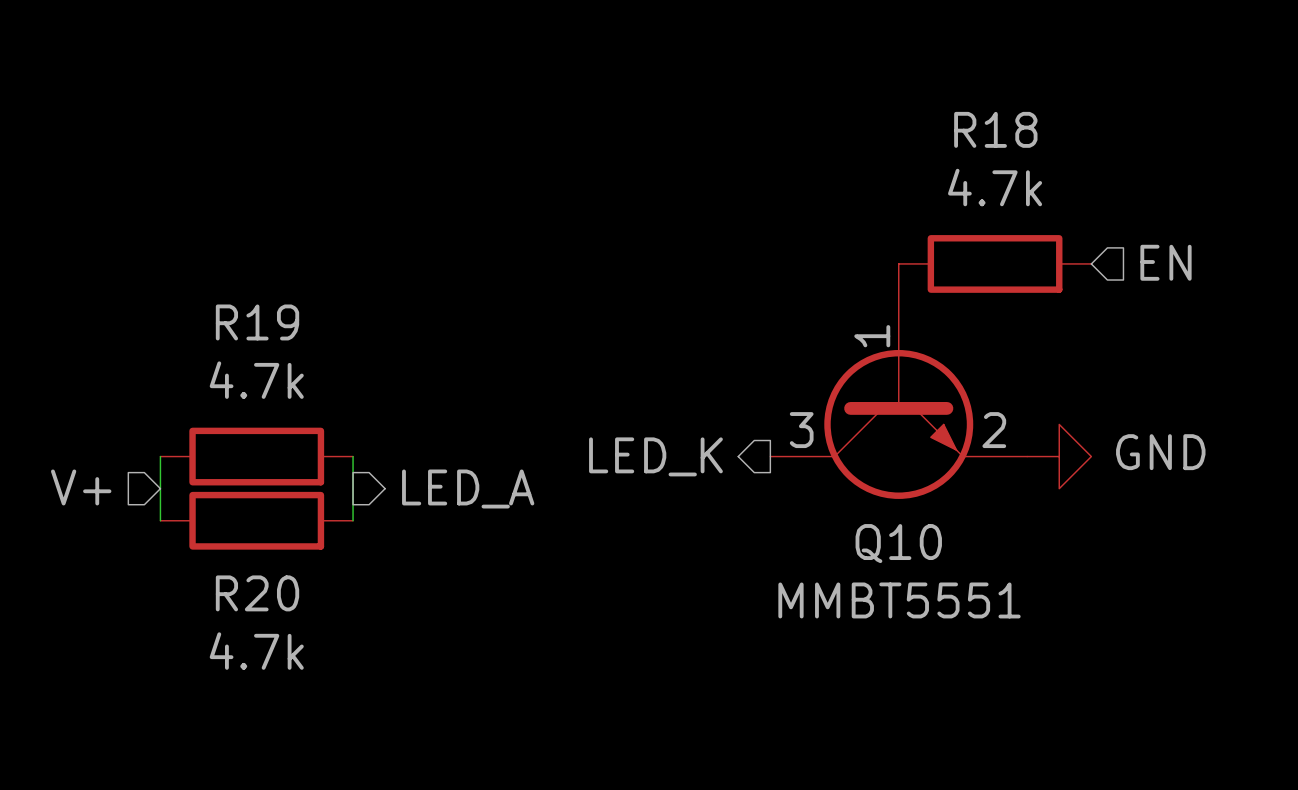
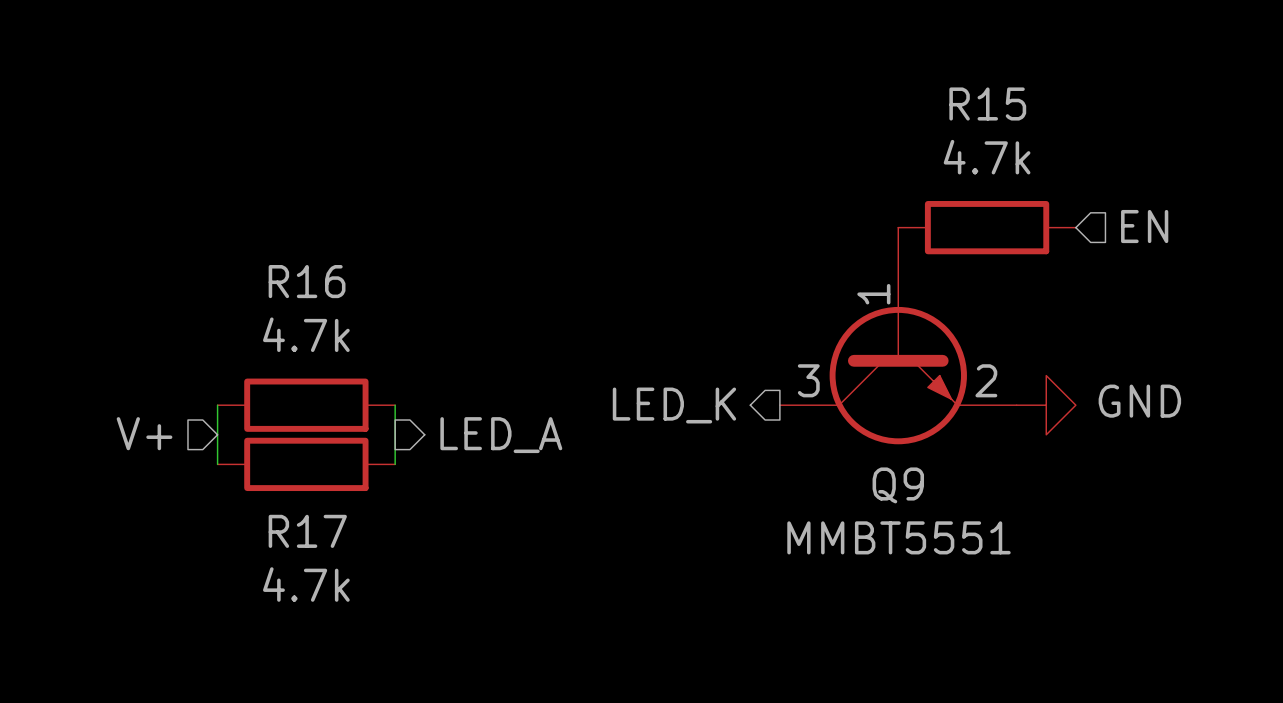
R18 name: R18 (995, 129) -> R15 (987, 103)
R19 name: R19 (257, 322) -> R16 (307, 281)
Q10 name: Q10 (898, 543) -> Q9 (898, 485)
R20 name: R20 (257, 593) -> R17 (307, 531)

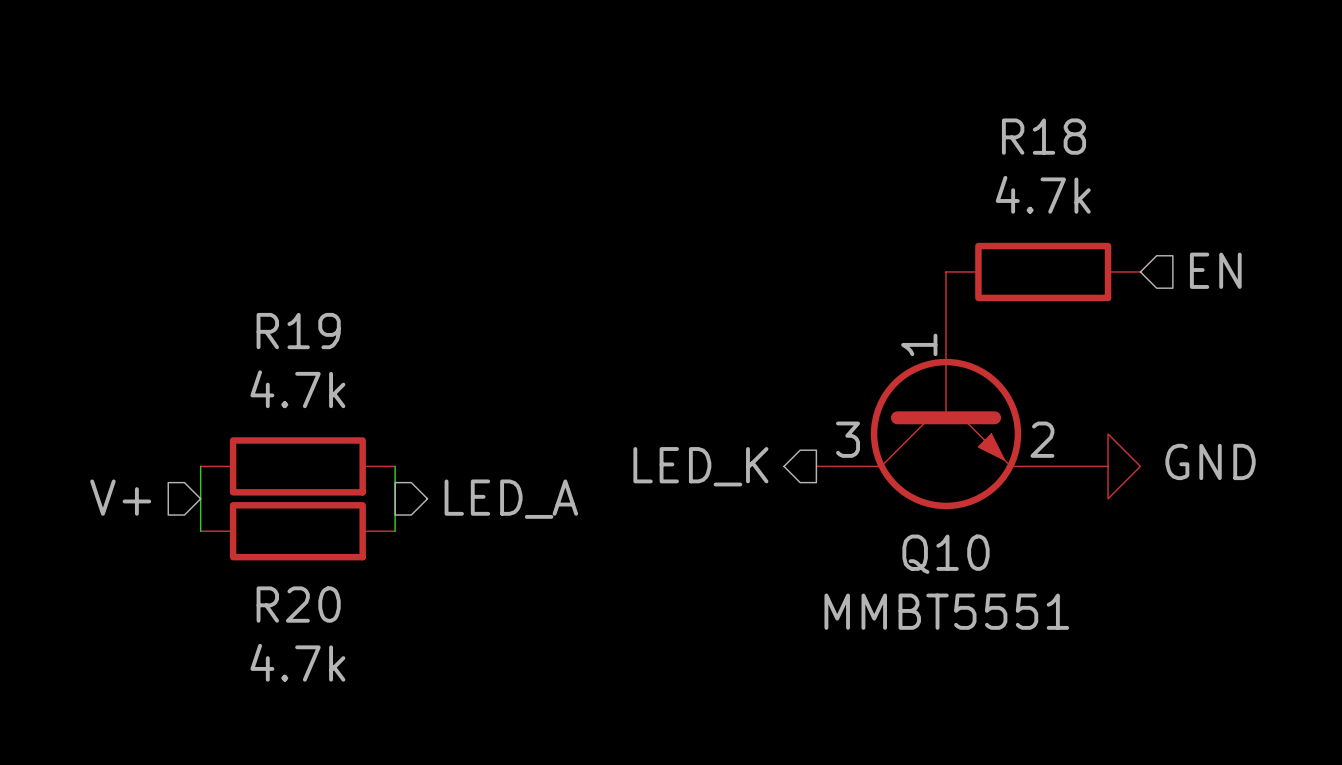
R15 name: R15 (987, 103) -> R18 (1044, 136)
R16 name: R16 (307, 281) -> R19 (298, 331)
Q9 name: Q9 (898, 485) -> Q10 (946, 554)
R17 name: R17 (307, 531) -> R20 (298, 604)

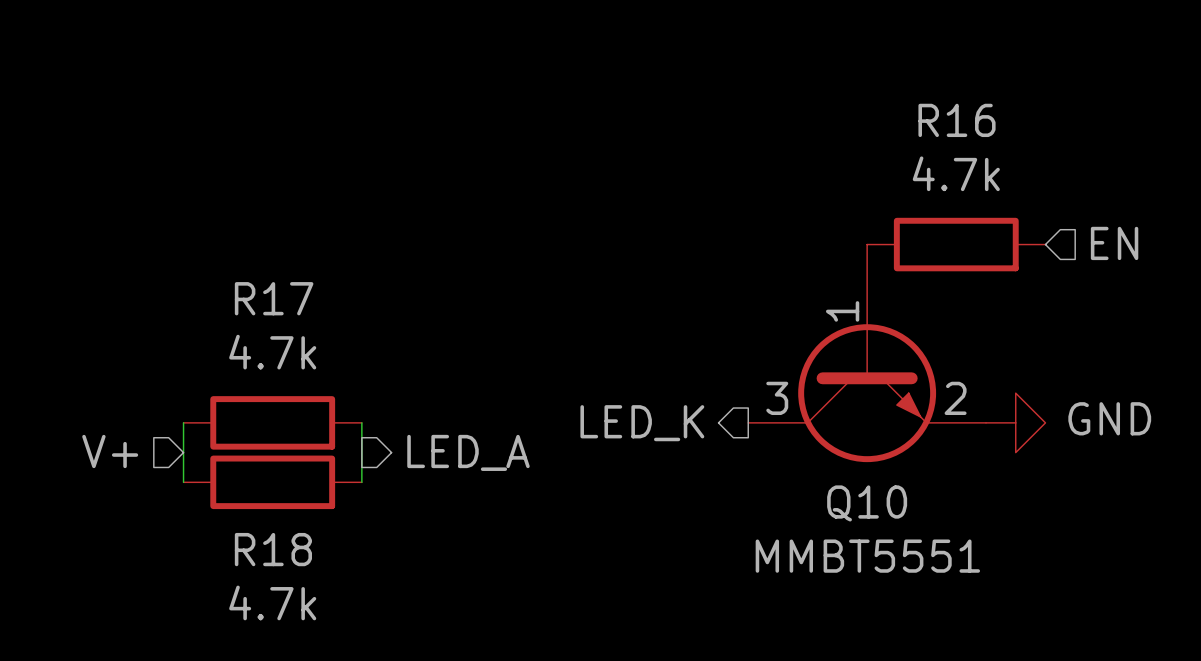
R18 name: R18 (1044, 136) -> R16 (957, 120)
R19 name: R19 (298, 331) -> R17 (274, 298)
R20 name: R20 (298, 604) -> R18 (273, 549)

